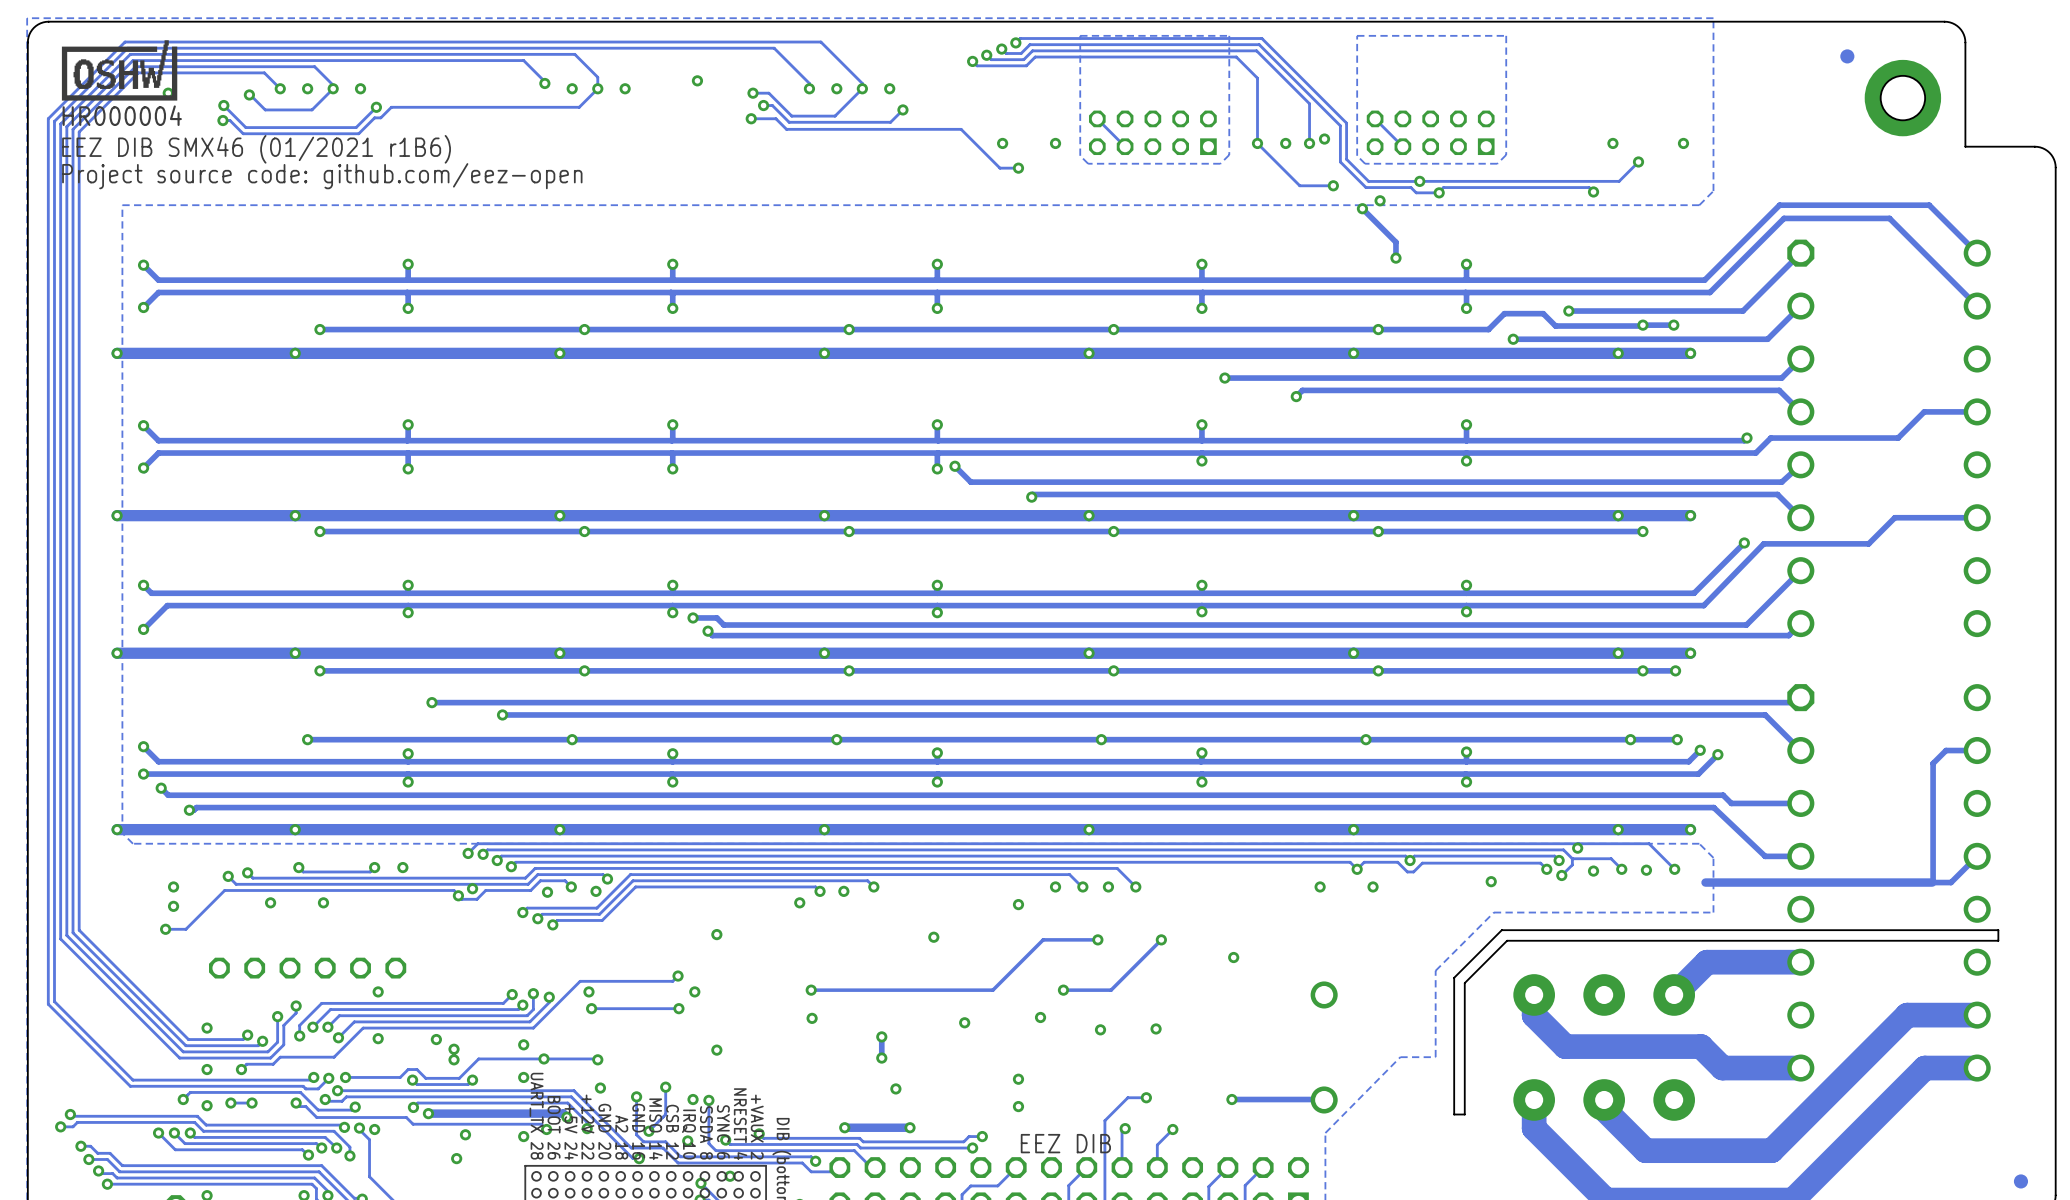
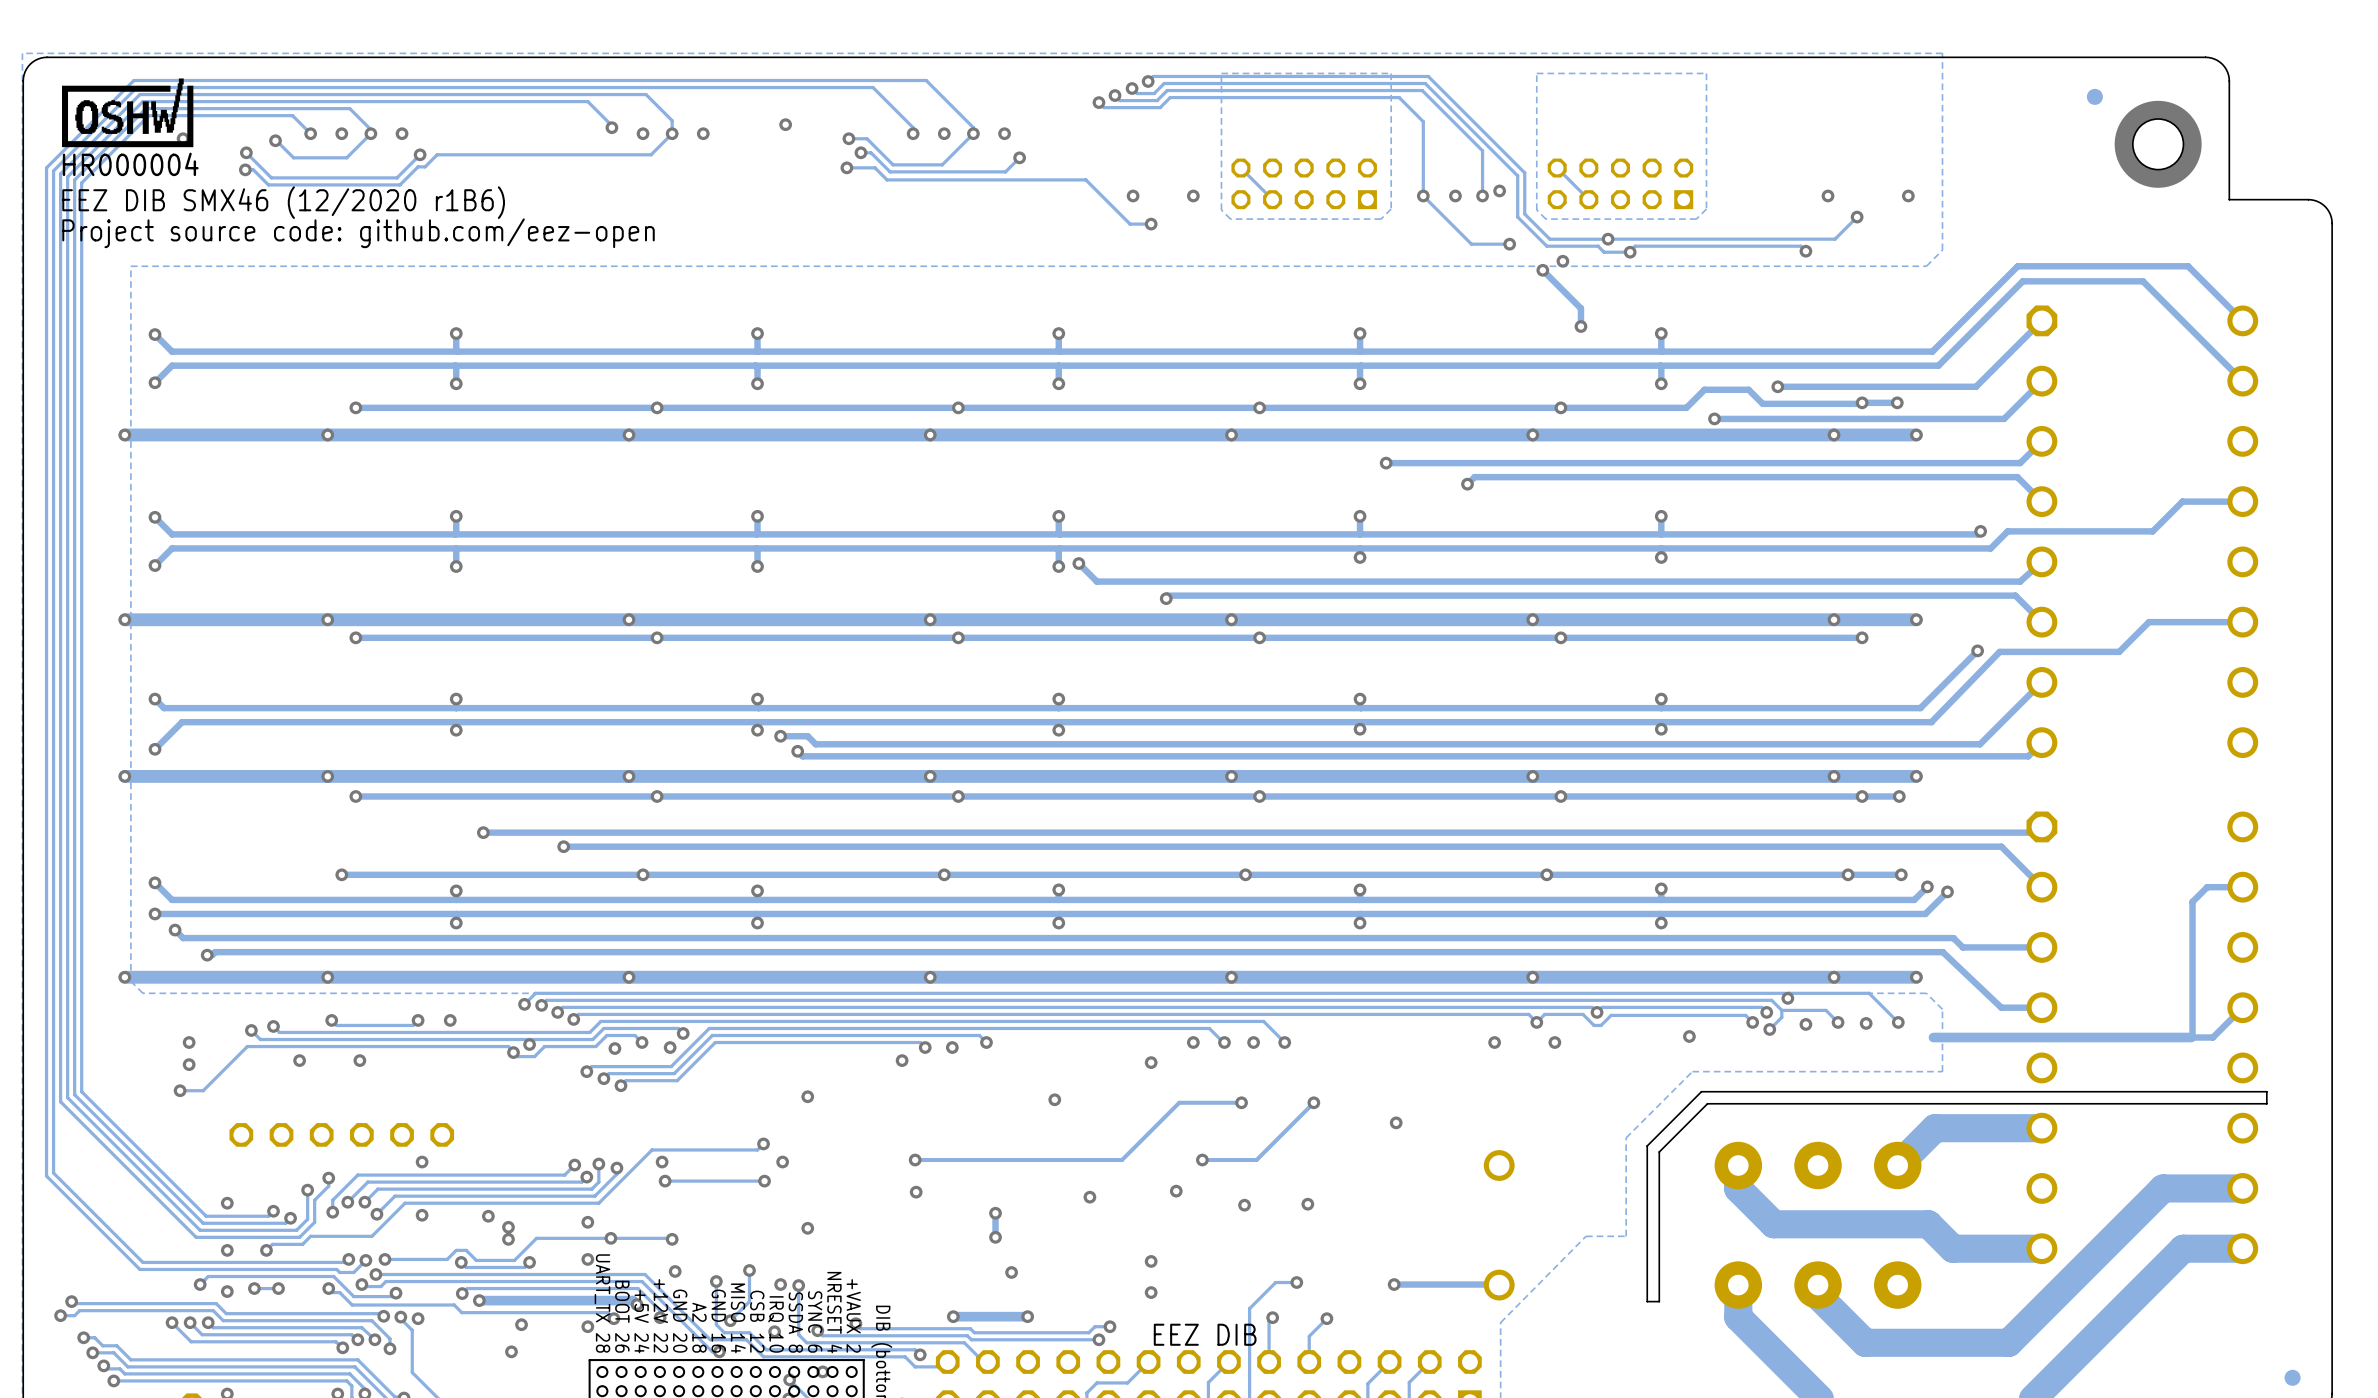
text: EEZ DIB SMX46 (01/2021 r1B6) (256, 149) -> EEZ DIB SMX46 (12/2020 r1B6) (283, 202)

